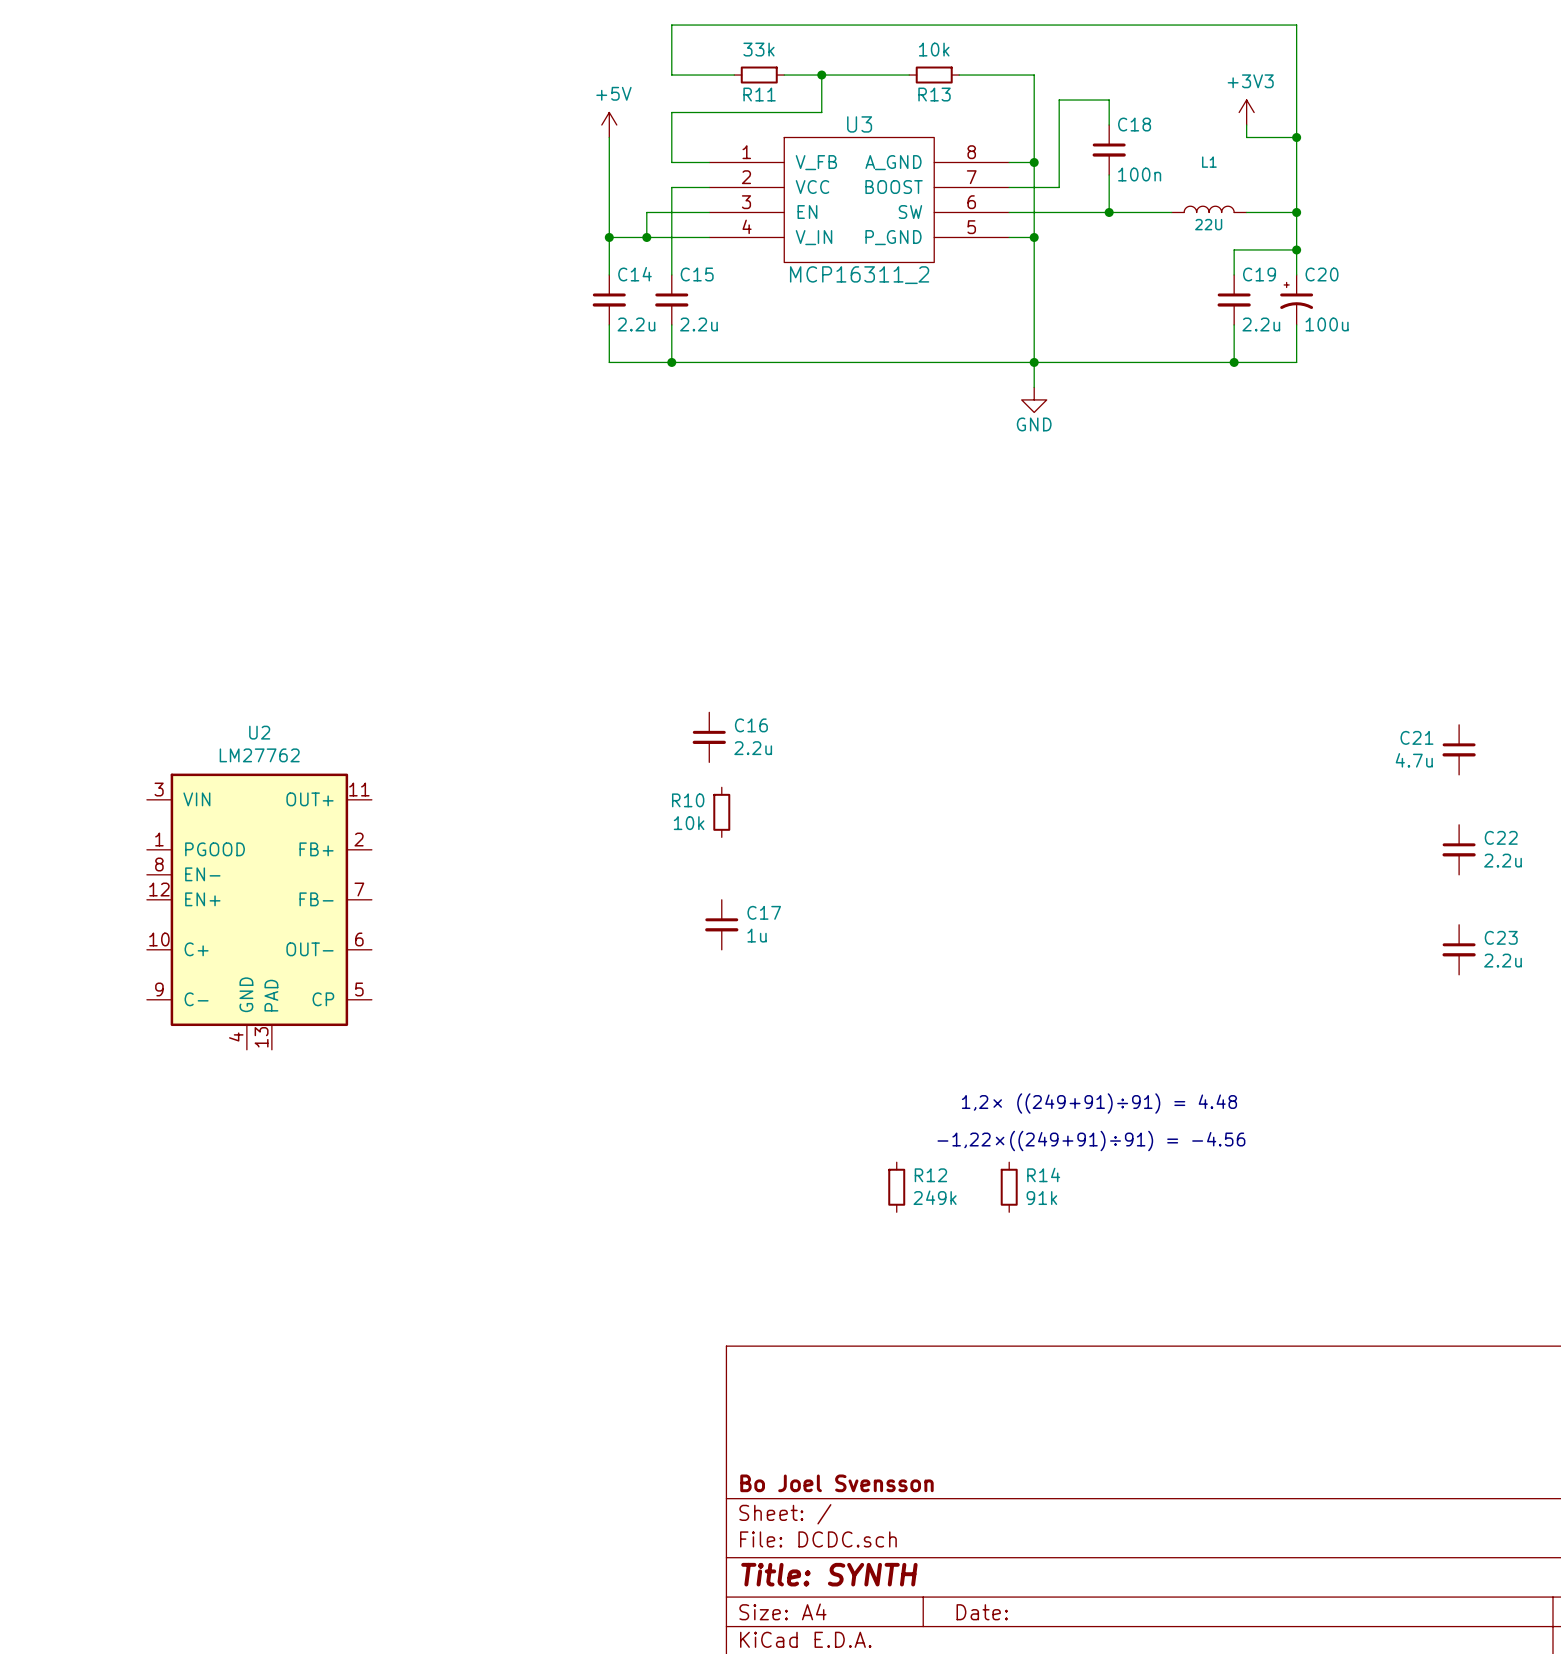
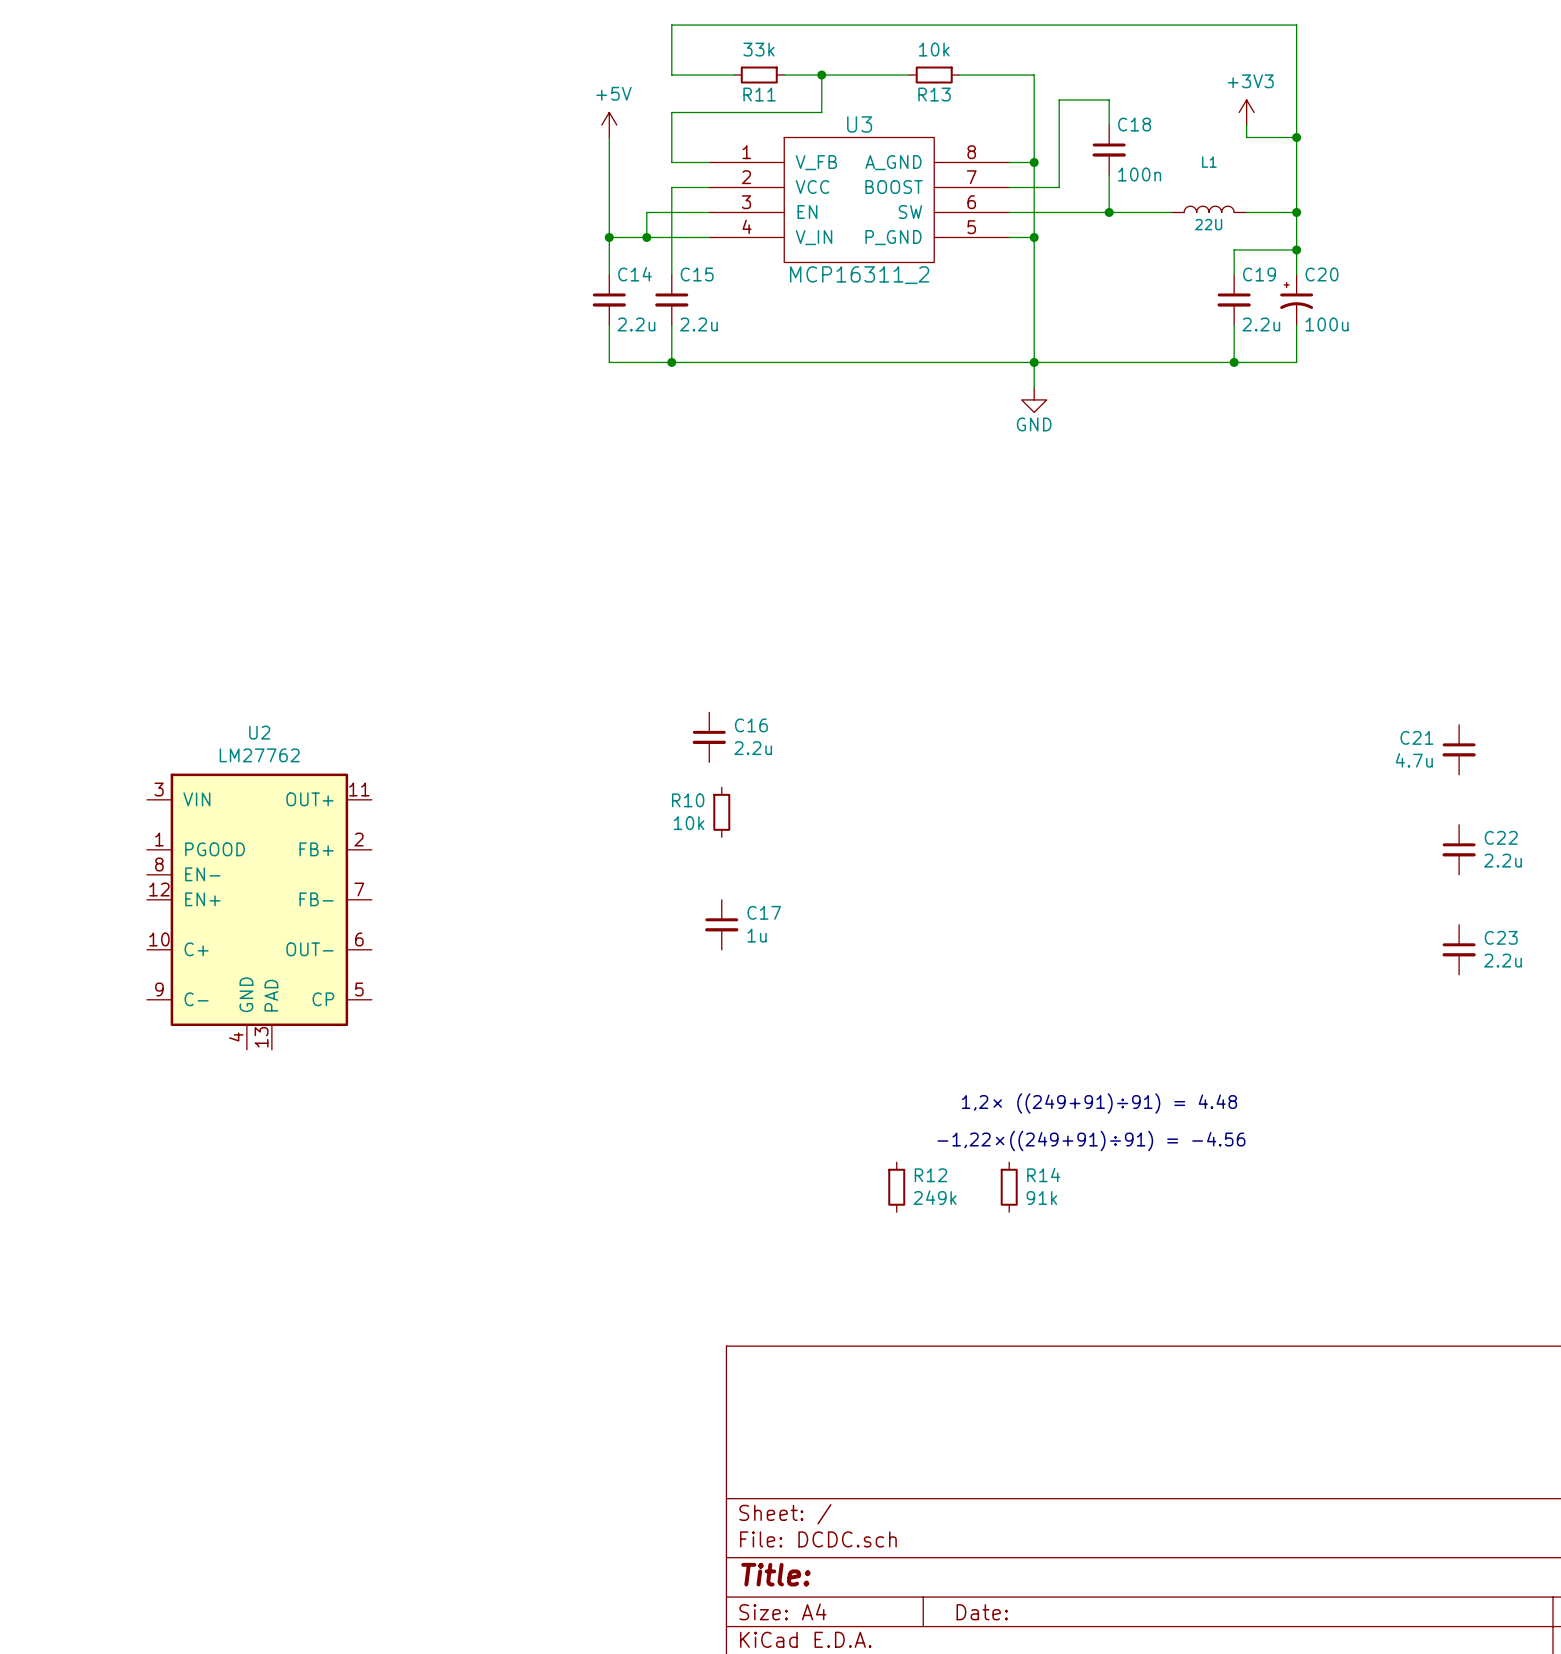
title block: Bo Joel Svensson (836, 1483) -> none
title block: Title: SYNTH (829, 1574) -> Title: (775, 1574)

